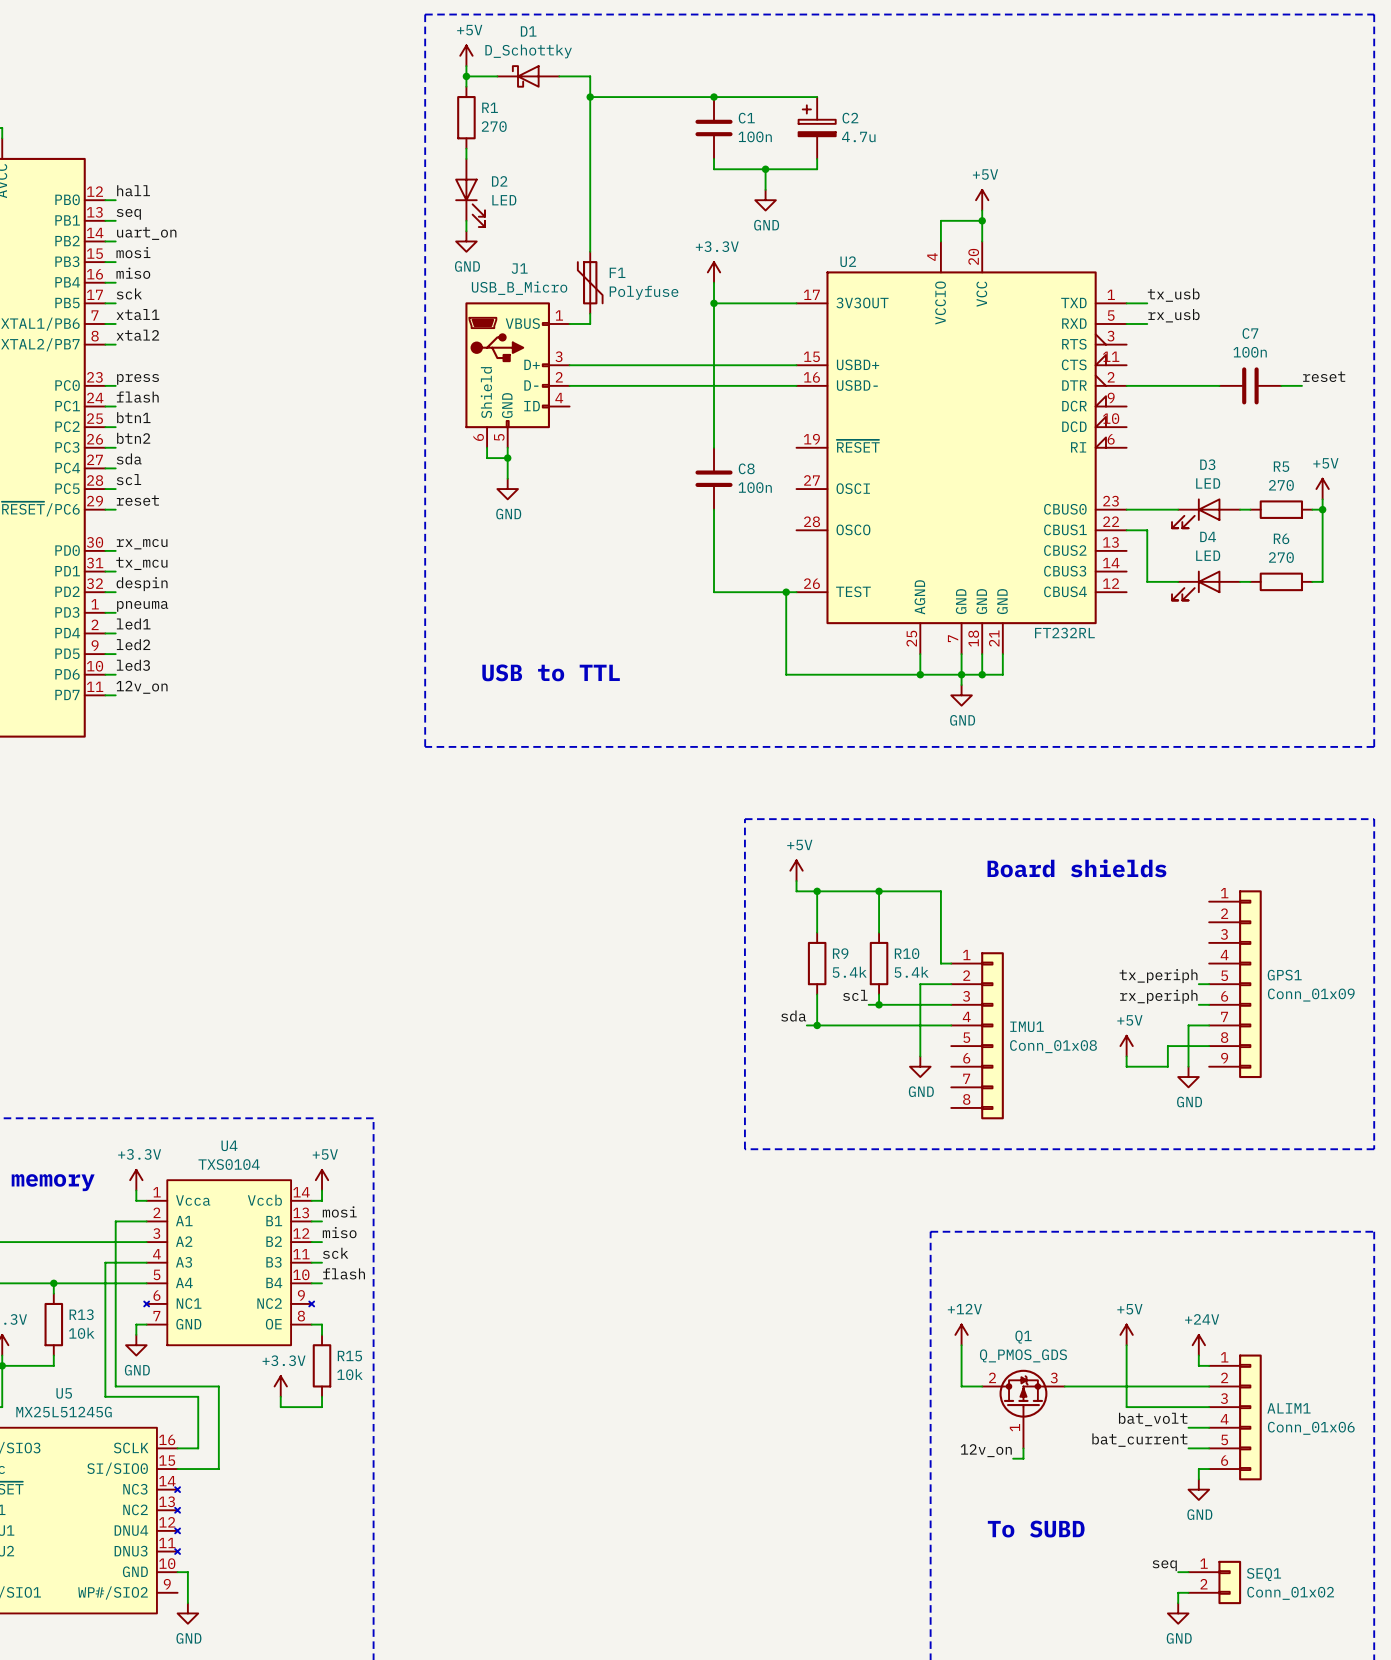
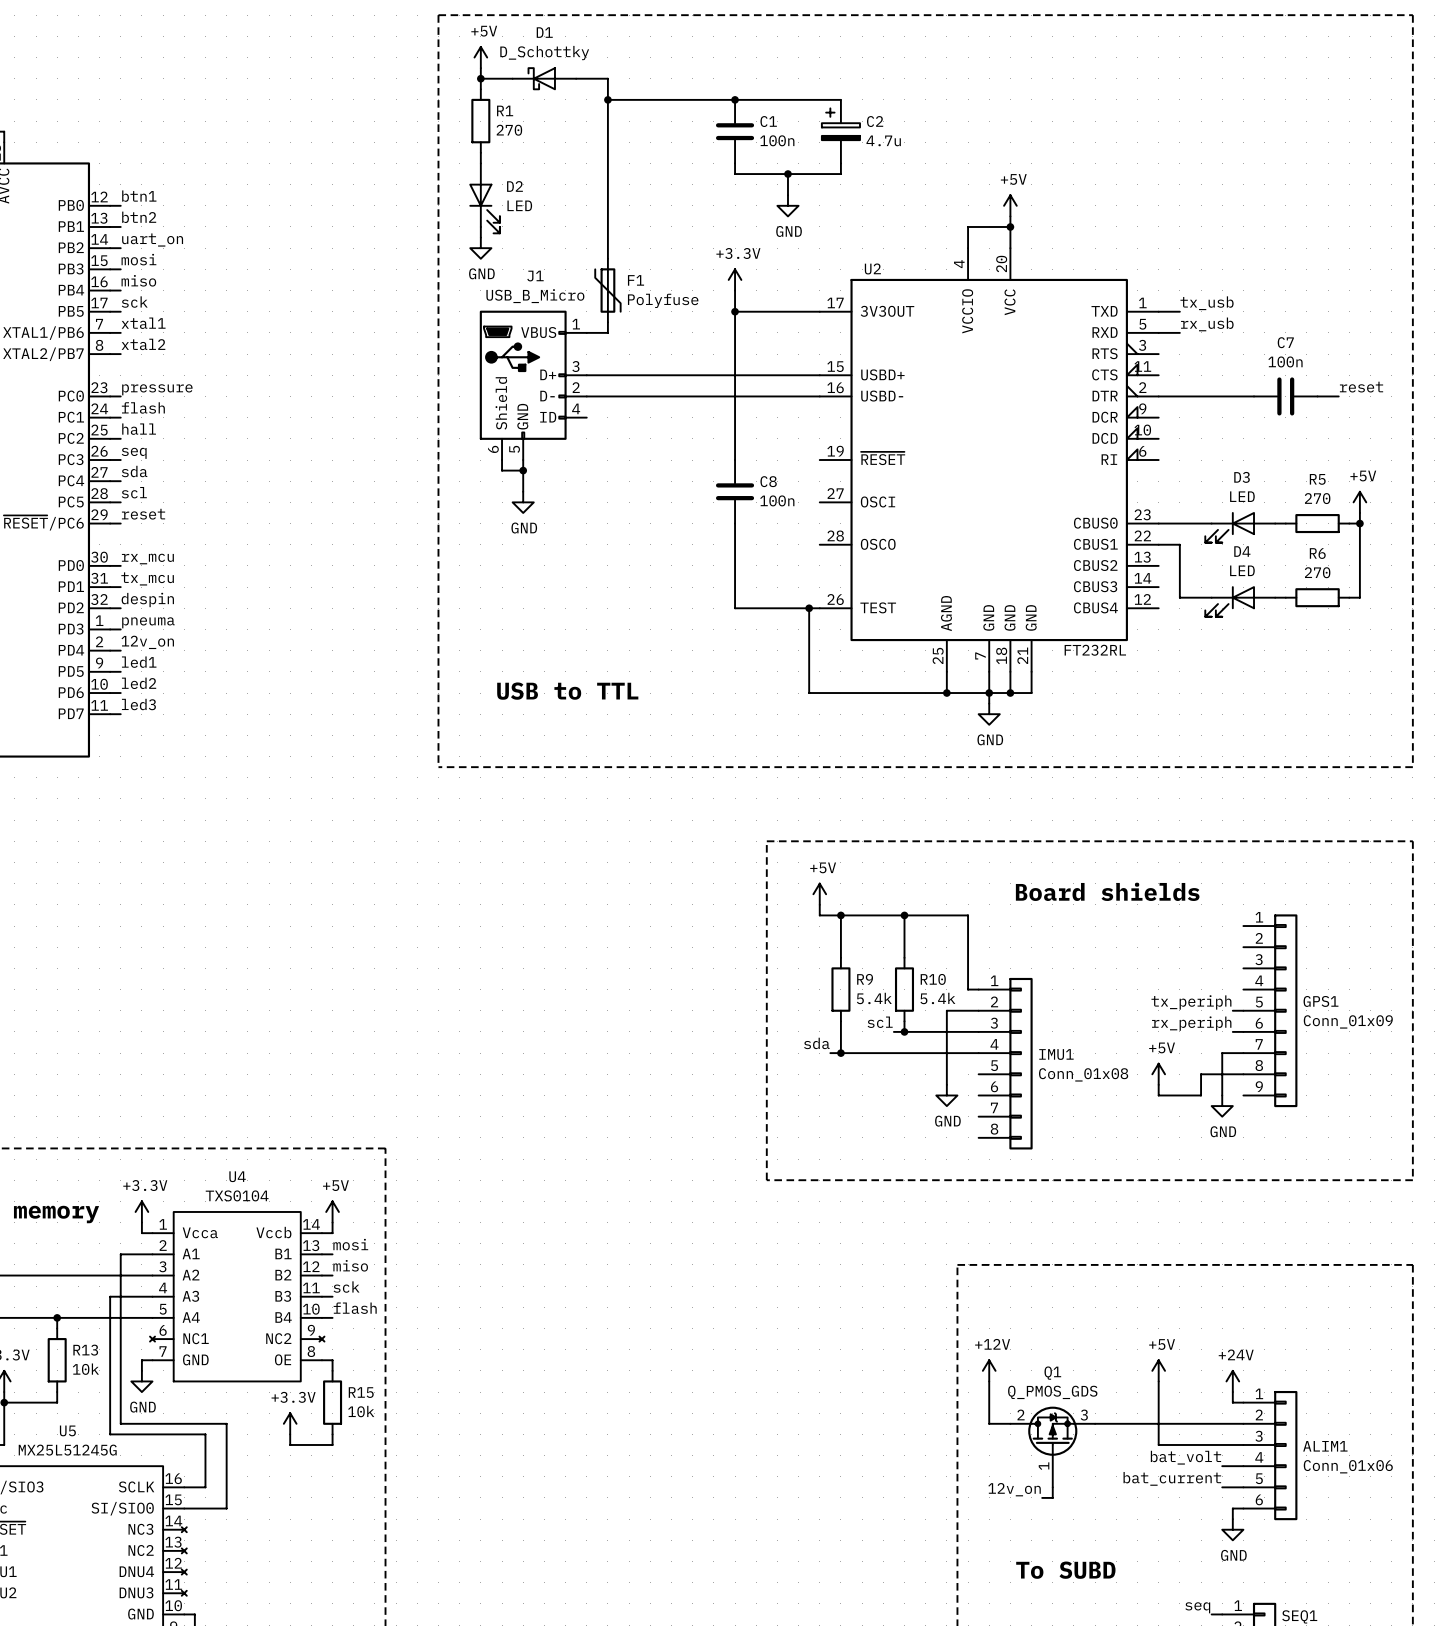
label: hall (133, 190) -> btn1 (139, 196)
label: seq (128, 214) -> btn2 (139, 217)
label: press (138, 379) -> pressure (157, 389)
label: btn1 (133, 417) -> hall (139, 429)
label: btn2 (133, 438) -> seq (134, 453)
label: led1 (133, 624) -> 12v_on (147, 642)
label: led2 (133, 644) -> led1 (139, 662)
label: led3 (133, 665) -> led2 (139, 683)
label: 12v_on (142, 687) -> led3 (138, 704)

